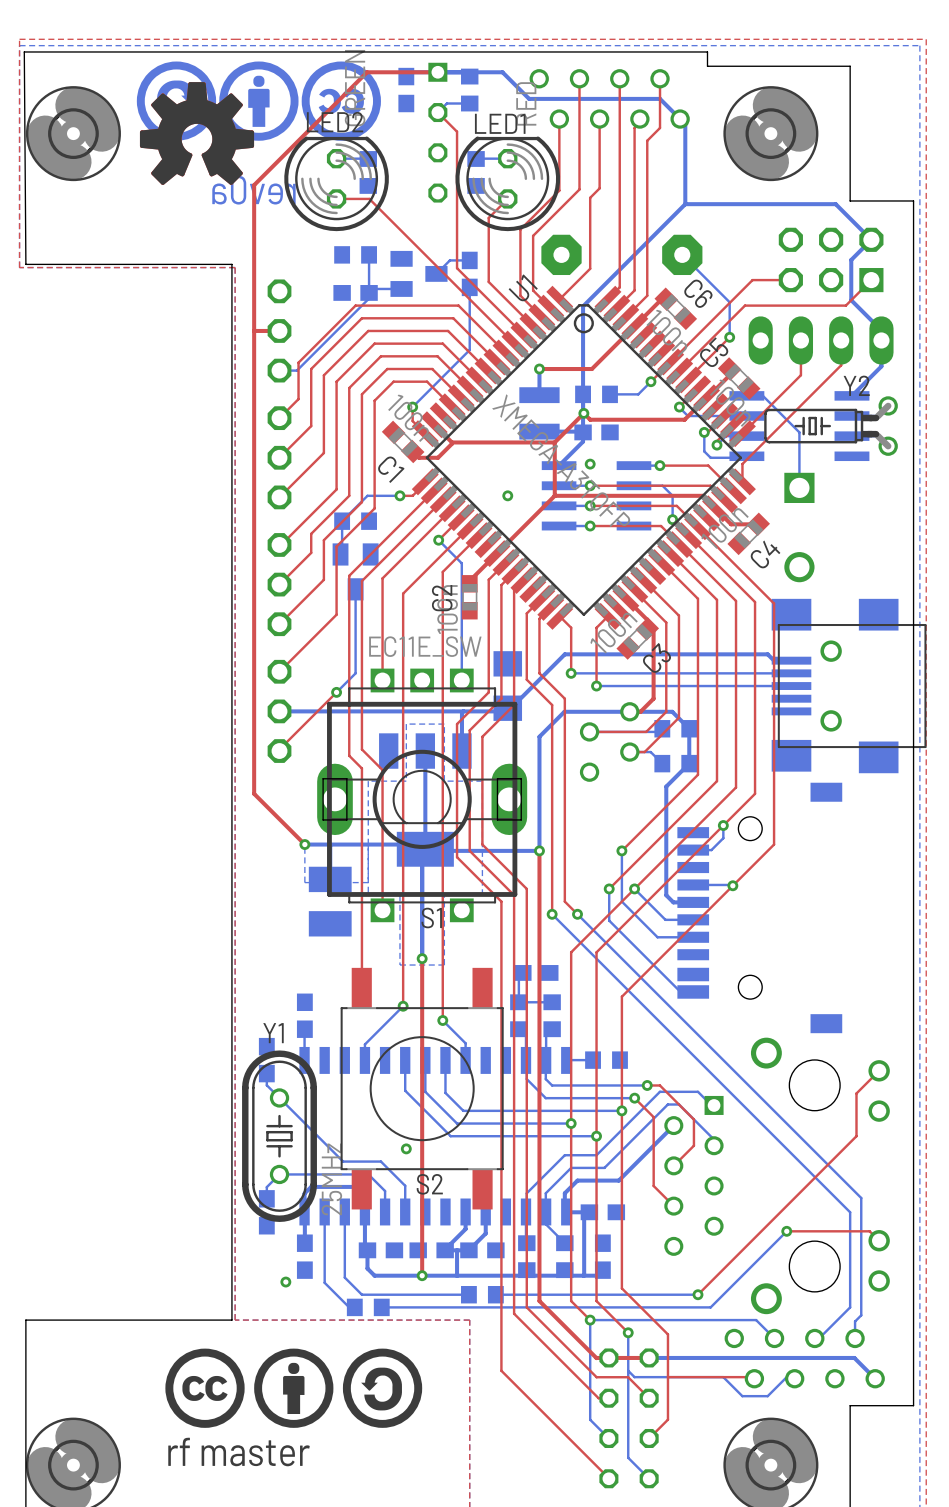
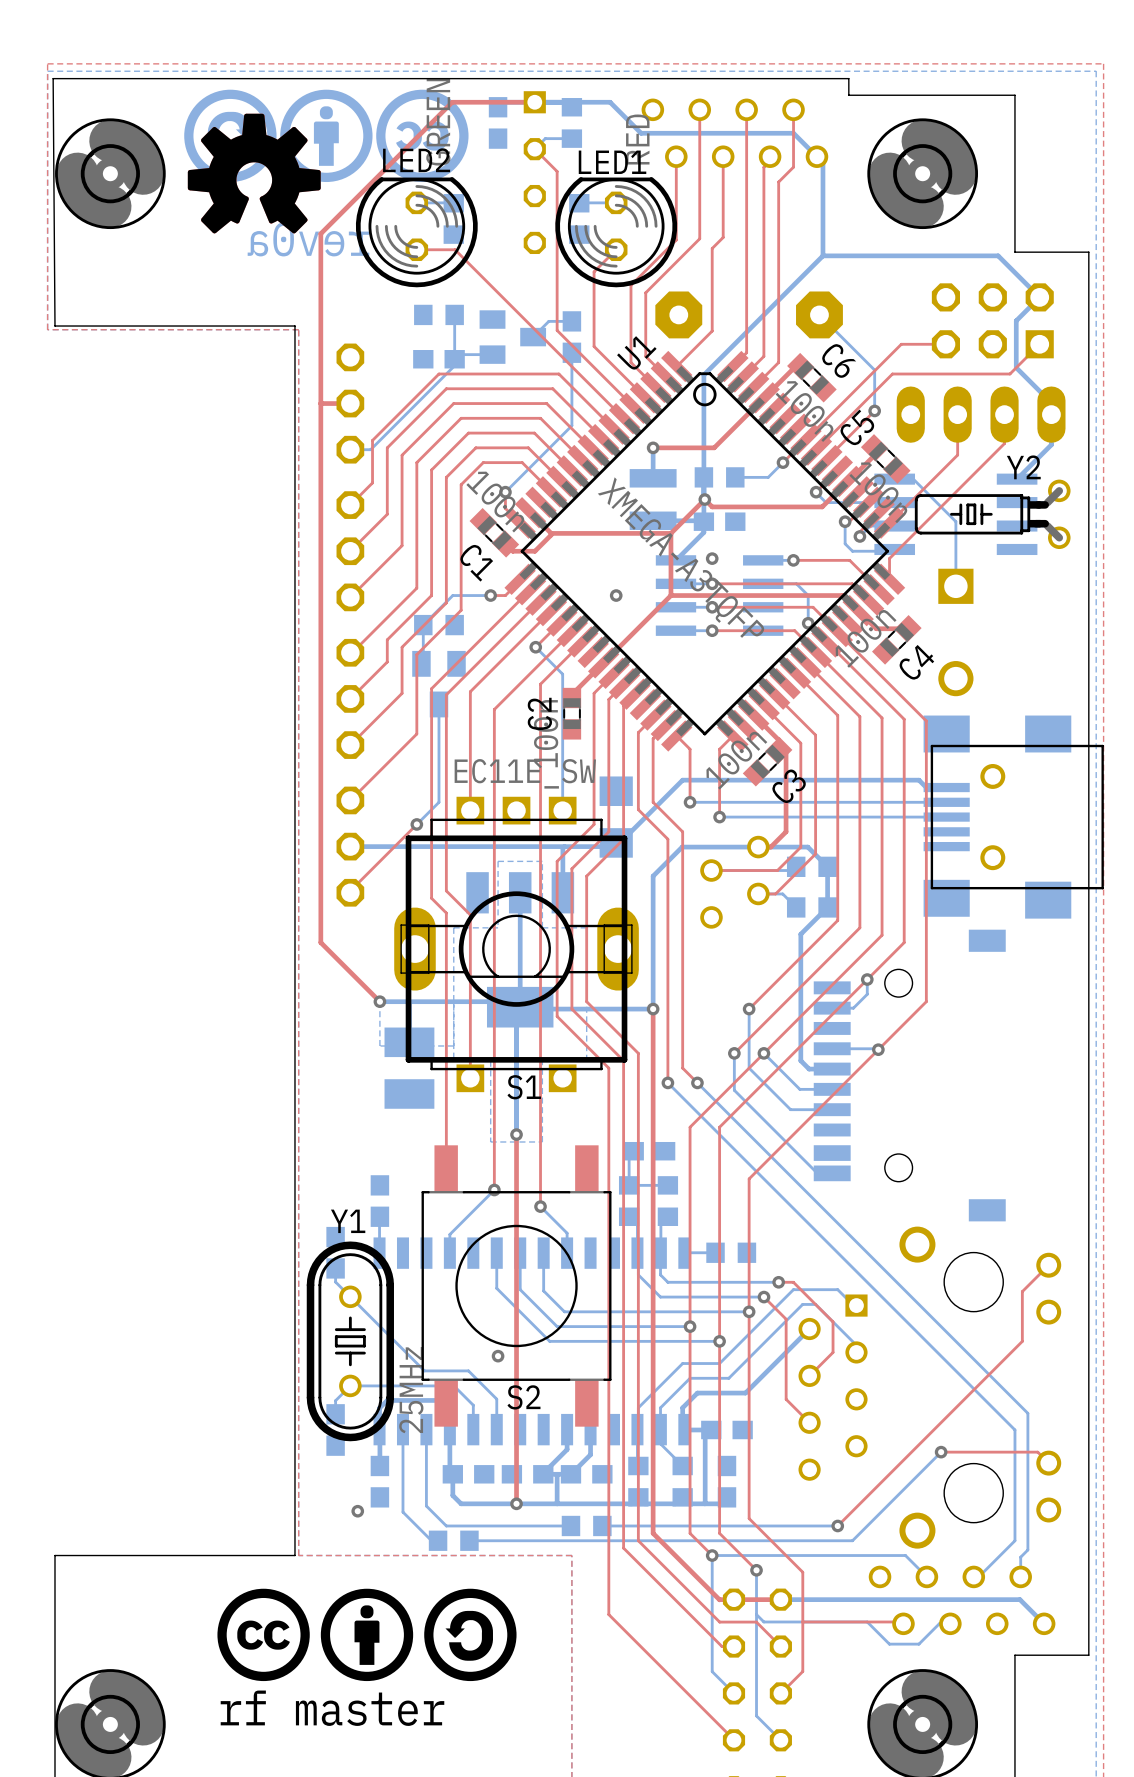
C6 footprint: [654, 287, 698, 331] -> [787, 352, 837, 403]
C5 footprint: [717, 357, 761, 400] -> [860, 434, 911, 484]
C1 footprint: [381, 420, 425, 464] -> [469, 507, 520, 558]
C4 footprint: [727, 512, 771, 556] -> [872, 615, 922, 665]
C2 footprint: [461, 575, 478, 620] -> [562, 687, 582, 740]
C3 footprint: [616, 617, 660, 660] -> [742, 736, 793, 787]

